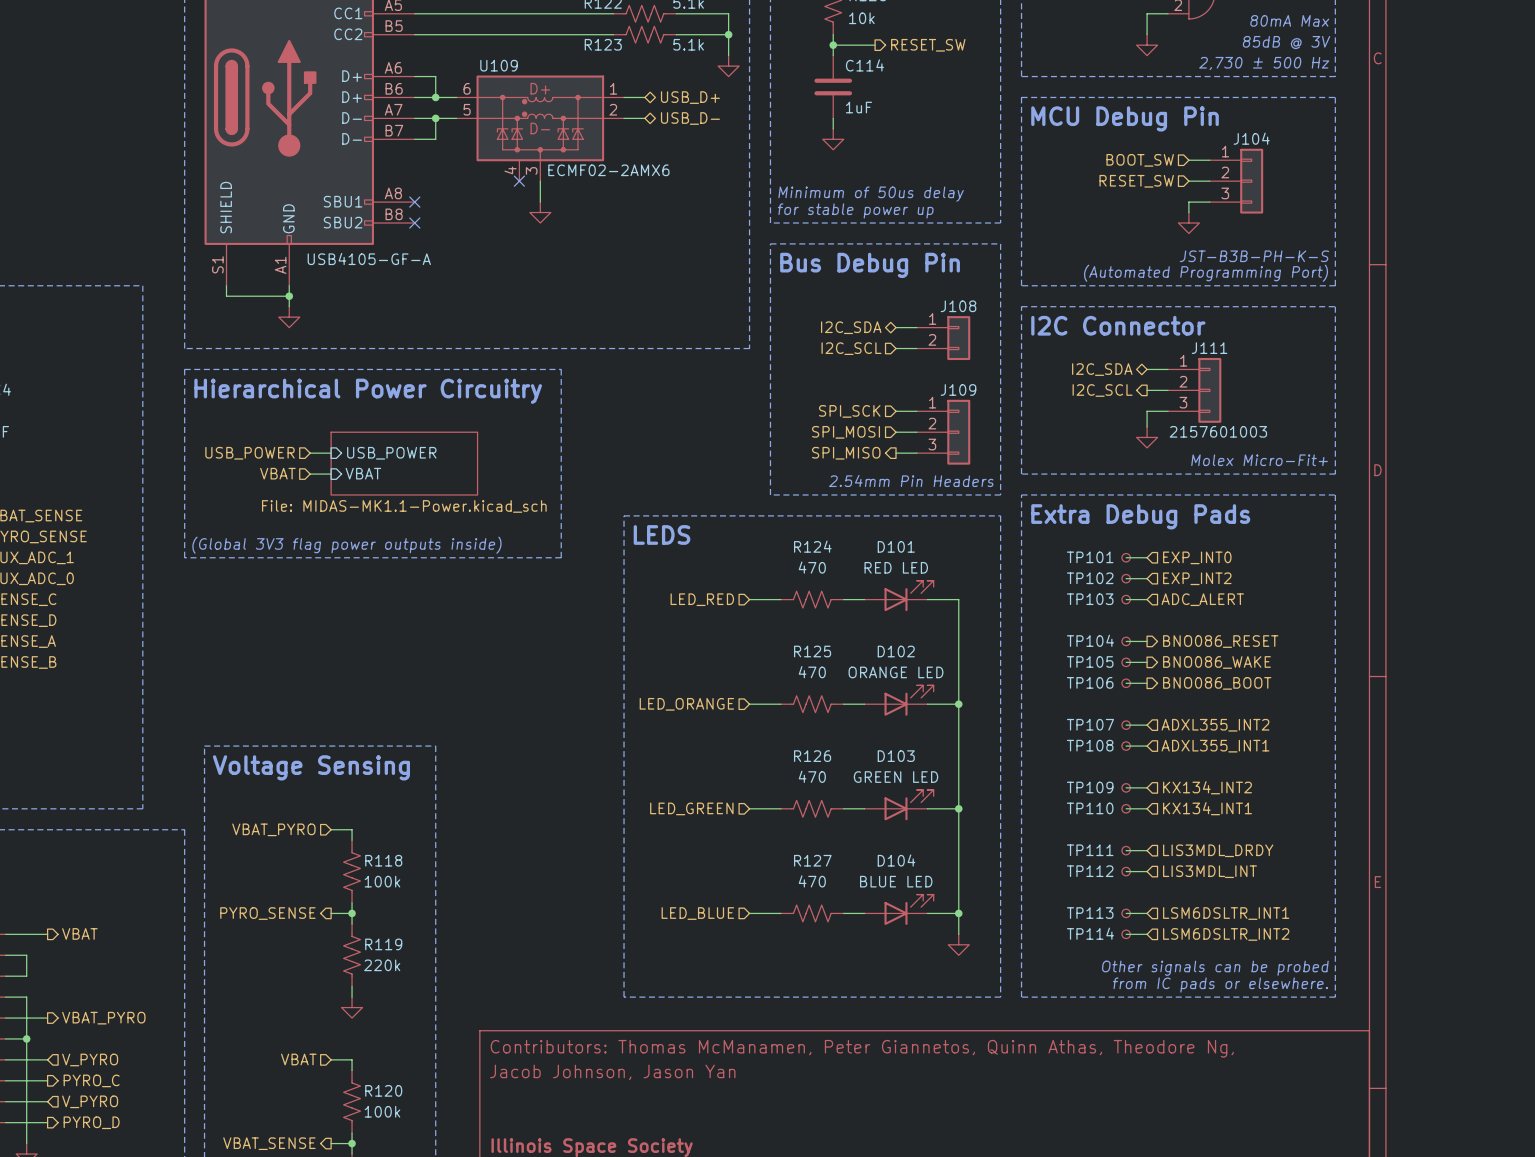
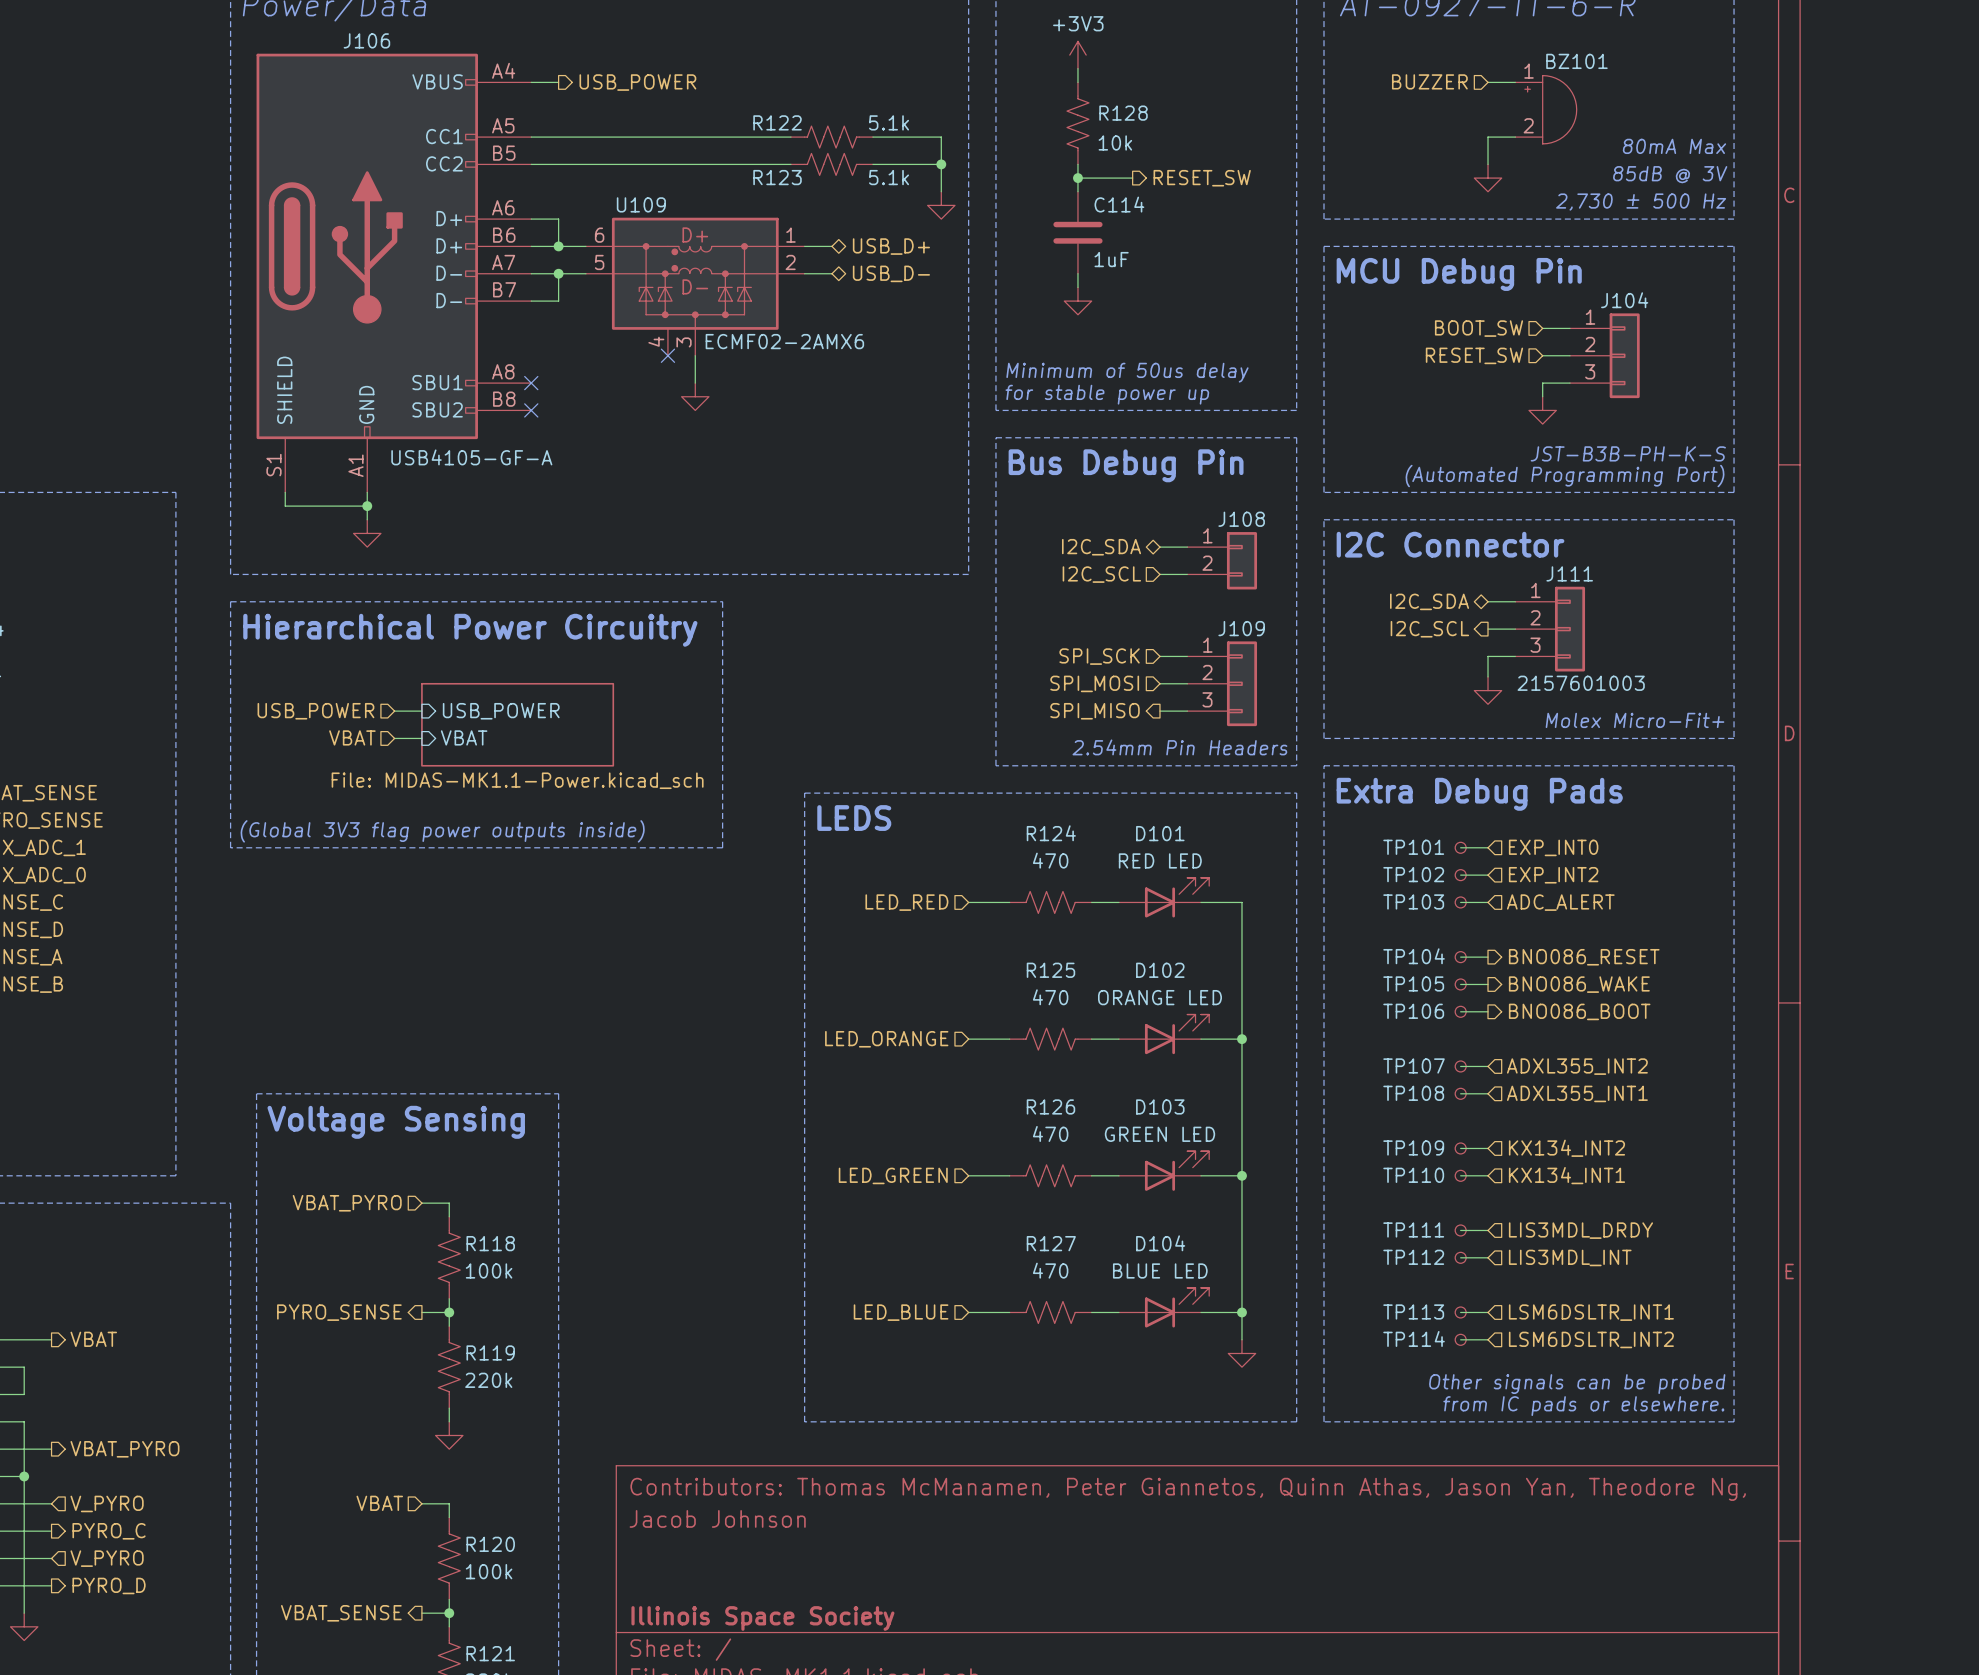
title block: Contributors: Thomas McManamen, Peter Giannetos, Quinn Athas, Theodore Ng, (862, 1048) -> Contributors: Thomas McManamen, Peter Giannetos, Quinn Athas, Jason Yan, Theodore Ng, (1188, 1489)
title block: Jacob Johnson, Jason Yan (612, 1072) -> Jacob Johnson (717, 1518)

